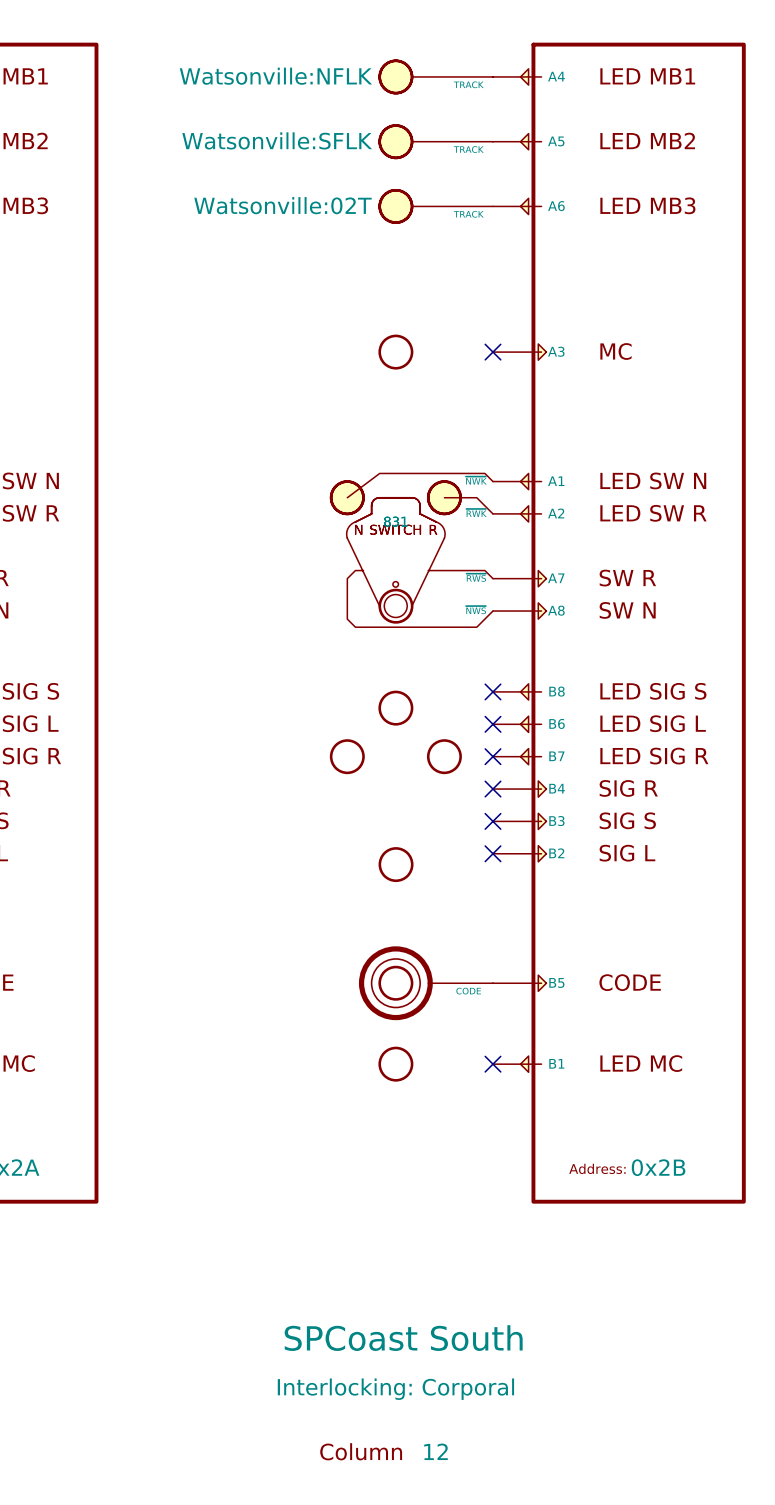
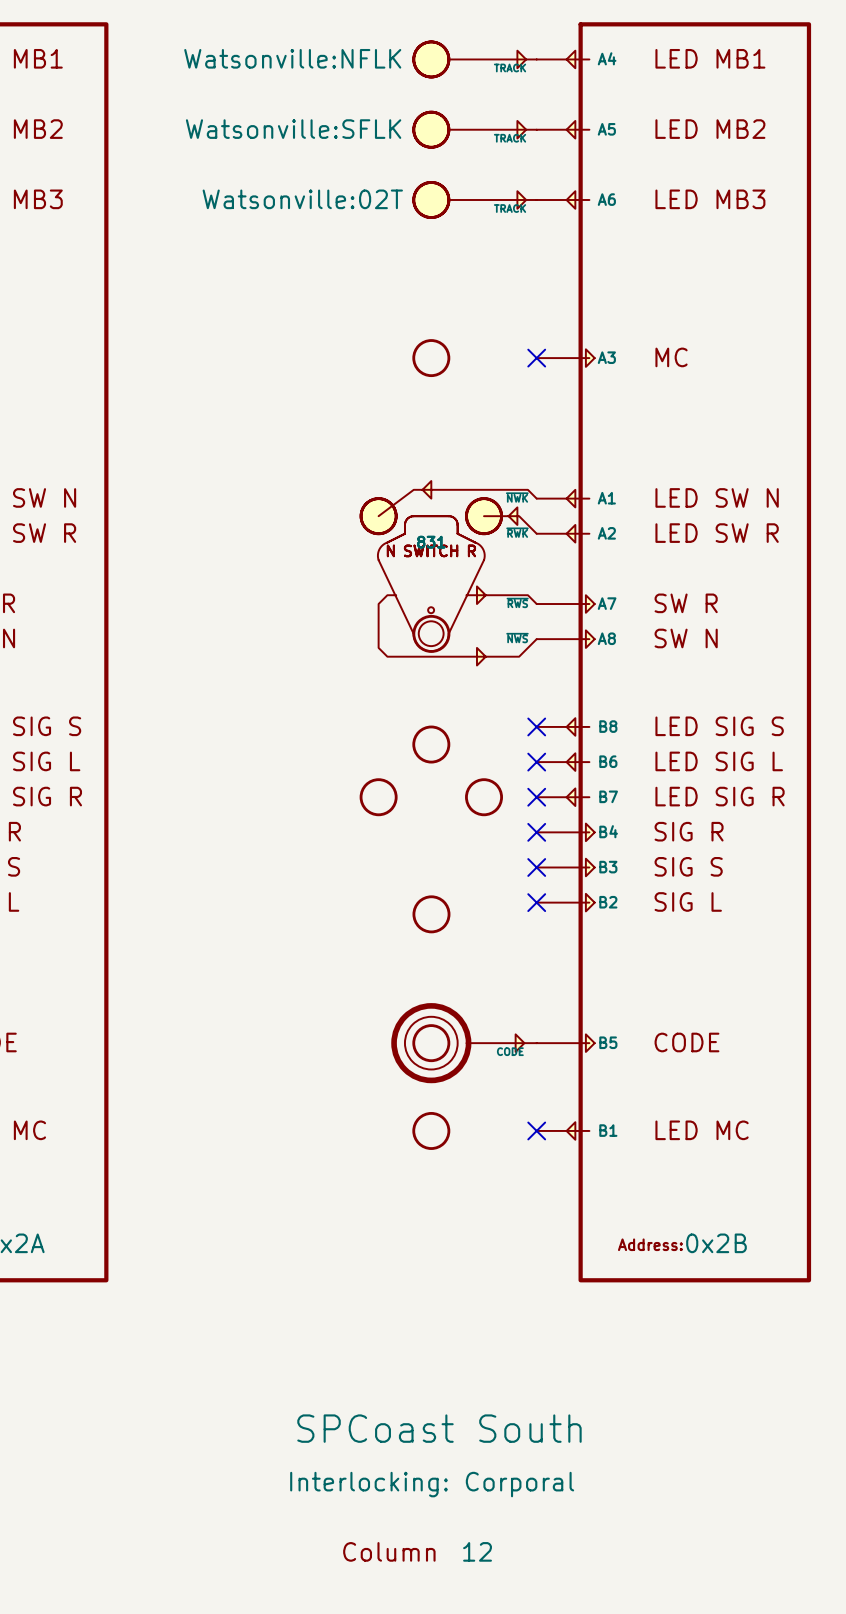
part symbol: [378, 59, 493, 95] -> [412, 40, 537, 79]
part symbol: [378, 124, 493, 160] -> [412, 110, 537, 149]
part symbol: [378, 188, 493, 224] -> [412, 181, 537, 219]
part symbol: [329, 473, 493, 523] -> [359, 481, 537, 543]
part symbol: [346, 497, 493, 628] -> [377, 516, 537, 666]
part symbol: [358, 946, 493, 1021] -> [391, 1003, 537, 1084]

